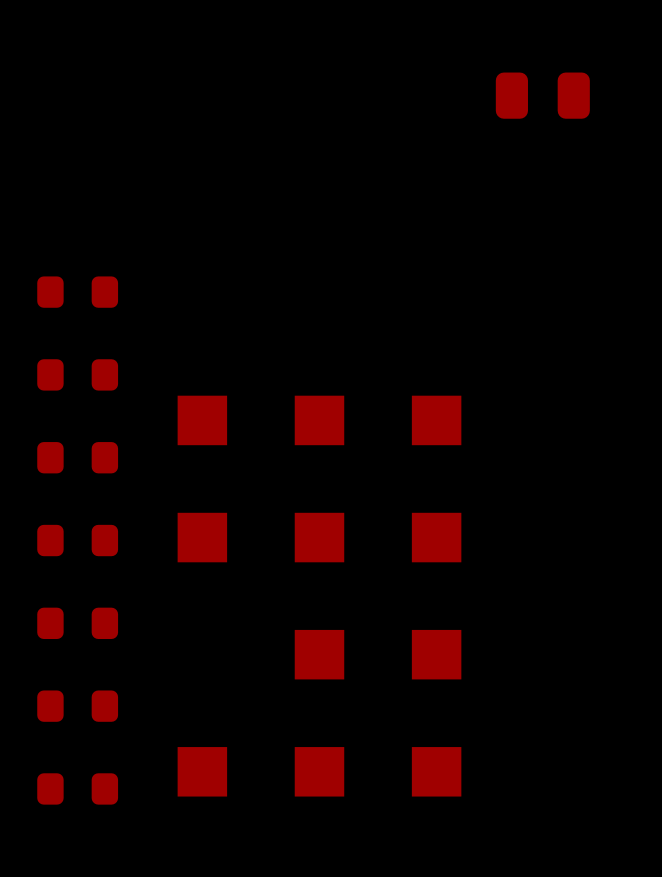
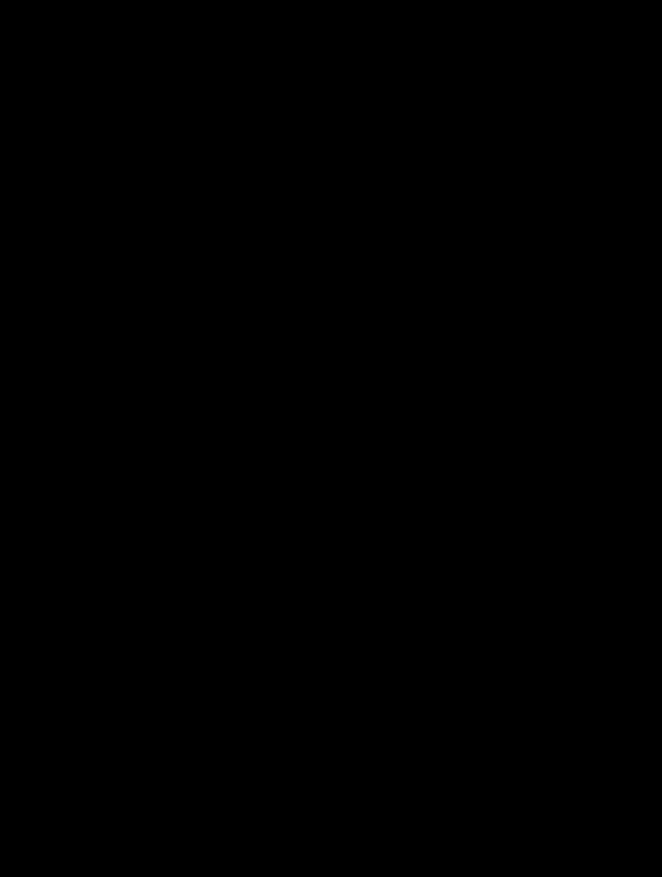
part: (542, 95) -> none
part: (77, 292) -> none
part: (77, 374) -> none
part: (202, 420) -> none
part: (319, 420) -> none
part: (436, 420) -> none
part: (77, 457) -> none
part: (202, 537) -> none
part: (319, 537) -> none
part: (436, 537) -> none
part: (77, 540) -> none
part: (77, 623) -> none
part: (319, 654) -> none
part: (436, 654) -> none
part: (77, 706) -> none
part: (202, 771) -> none
part: (319, 771) -> none
part: (436, 771) -> none
part: (77, 788) -> none

